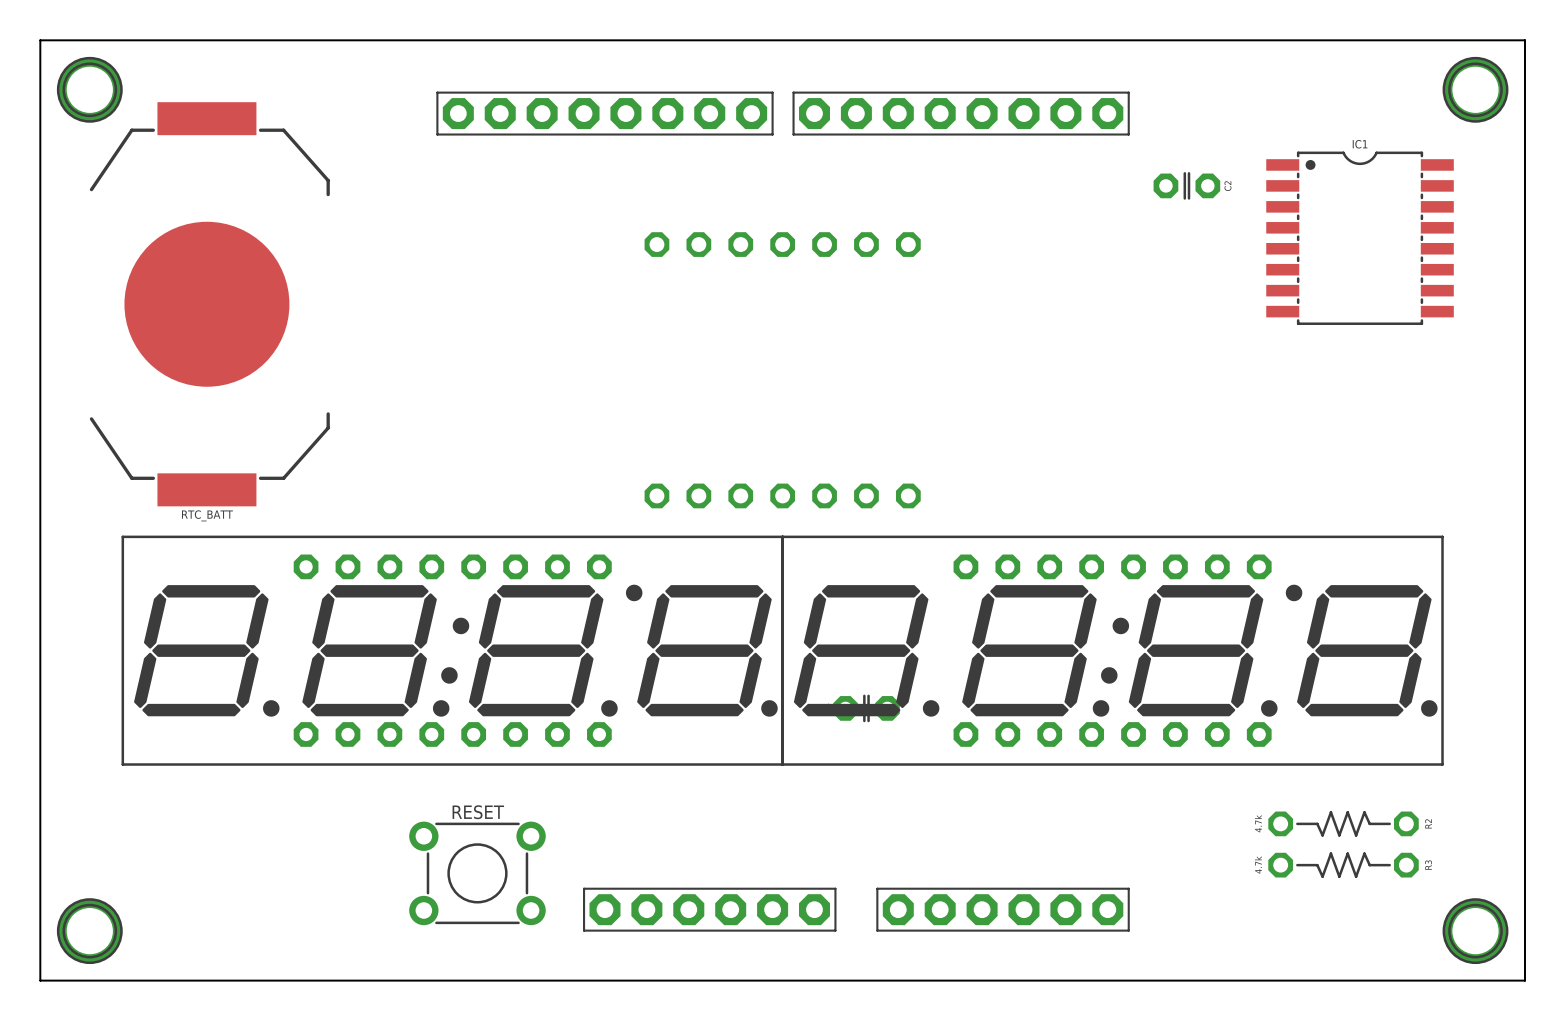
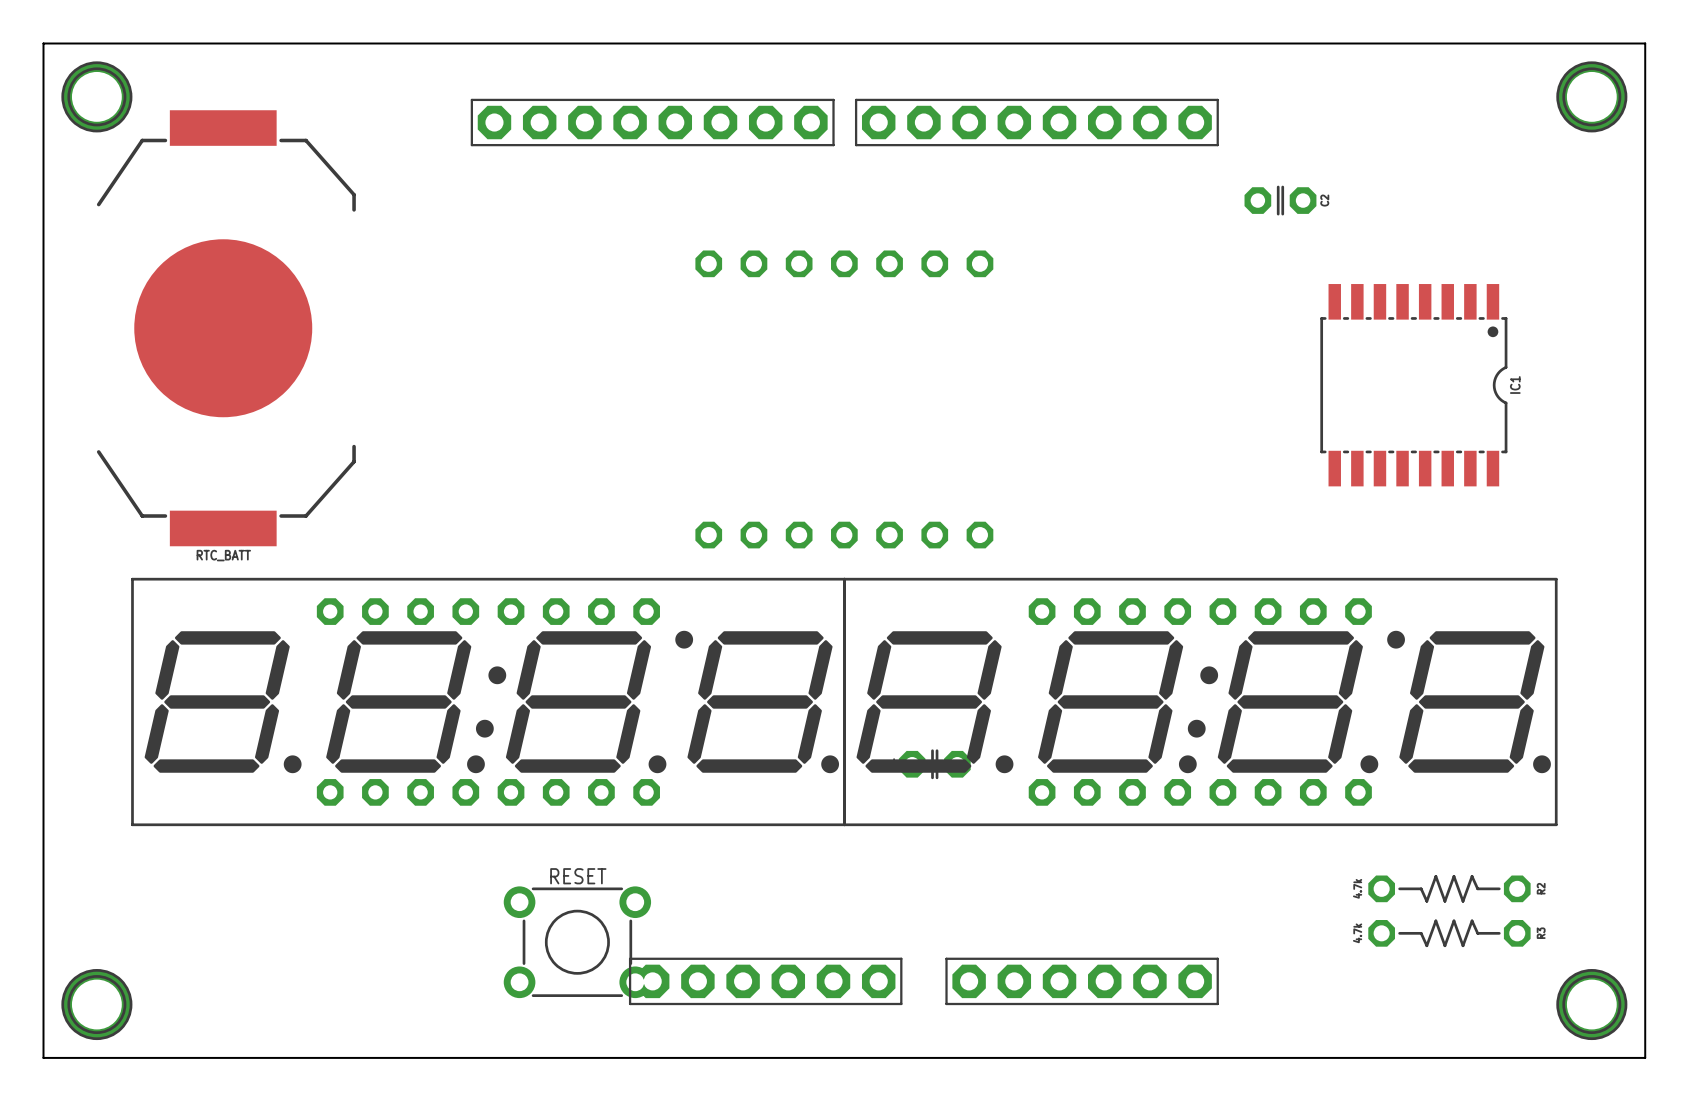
IC1 rotation: 0° (1360, 238) -> 90° clockwise (1413, 385)
IC1 position: (1360, 238) -> (1413, 385)
RESET position: (477, 873) -> (577, 942)

